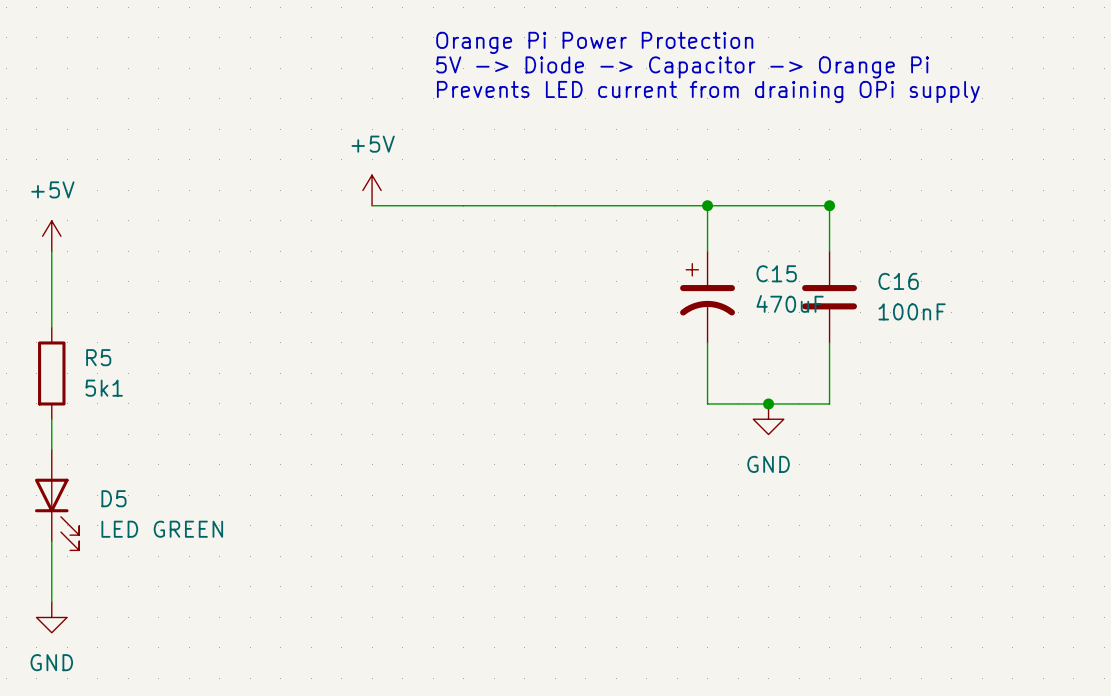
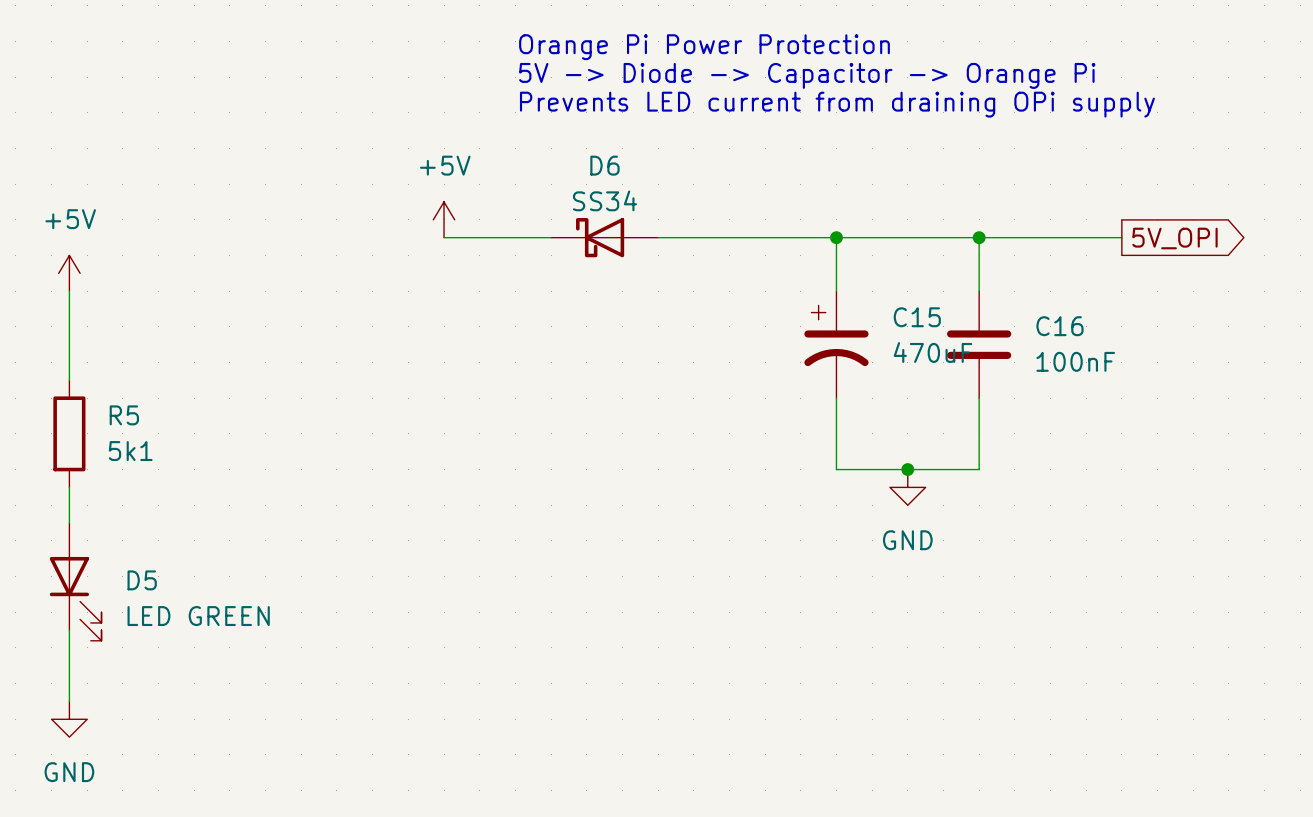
D6: none -> SS34 (604, 237)
wire: none -> (979, 237) (1121, 237)
global label: none -> 5V_OPI (1174, 238)

